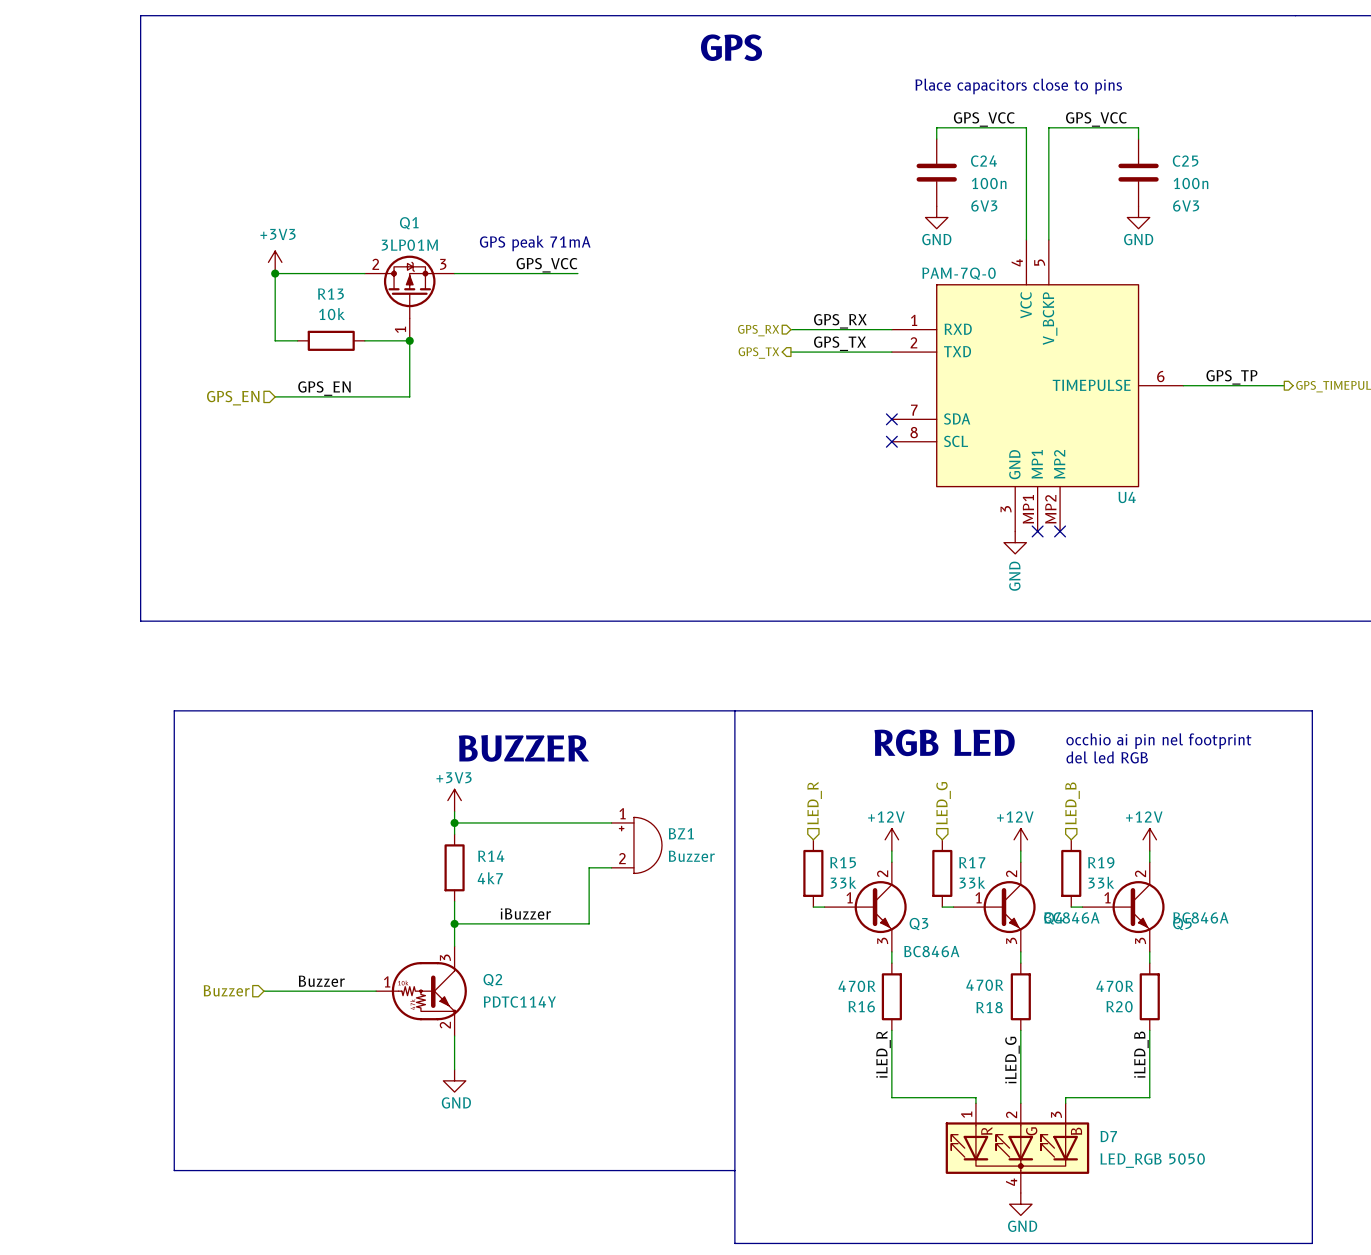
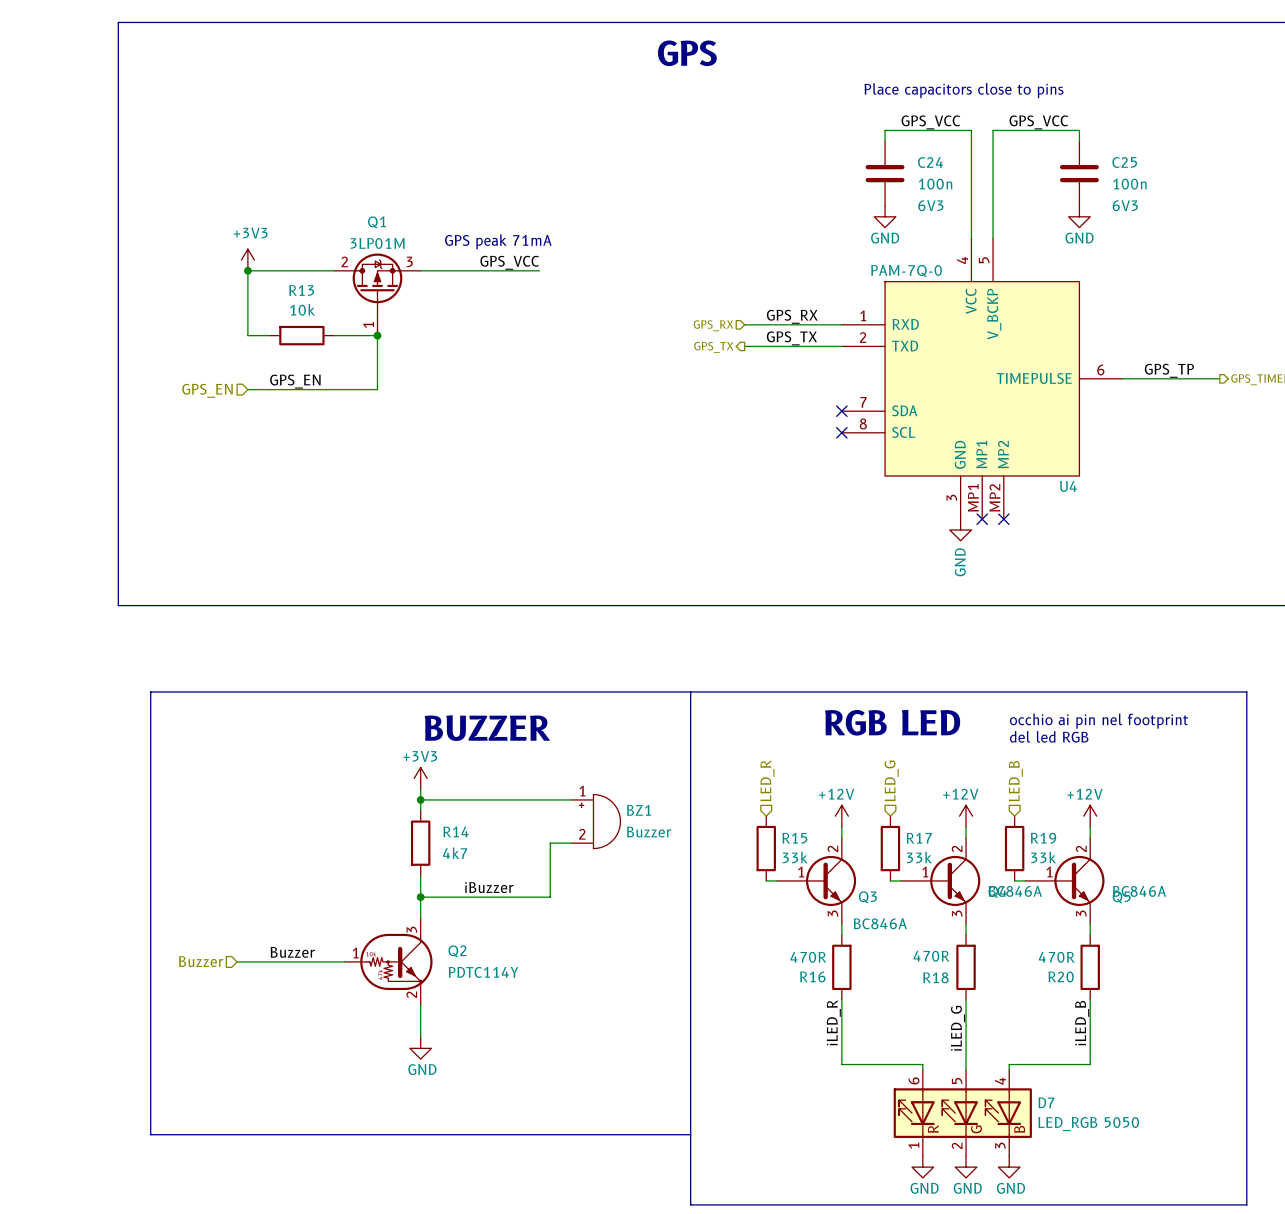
D7 symbol: [945, 1103, 1090, 1193] -> [893, 1069, 1032, 1157]
power symbol: none -> GND (922, 1167)
power symbol: none -> GND (1009, 1167)

